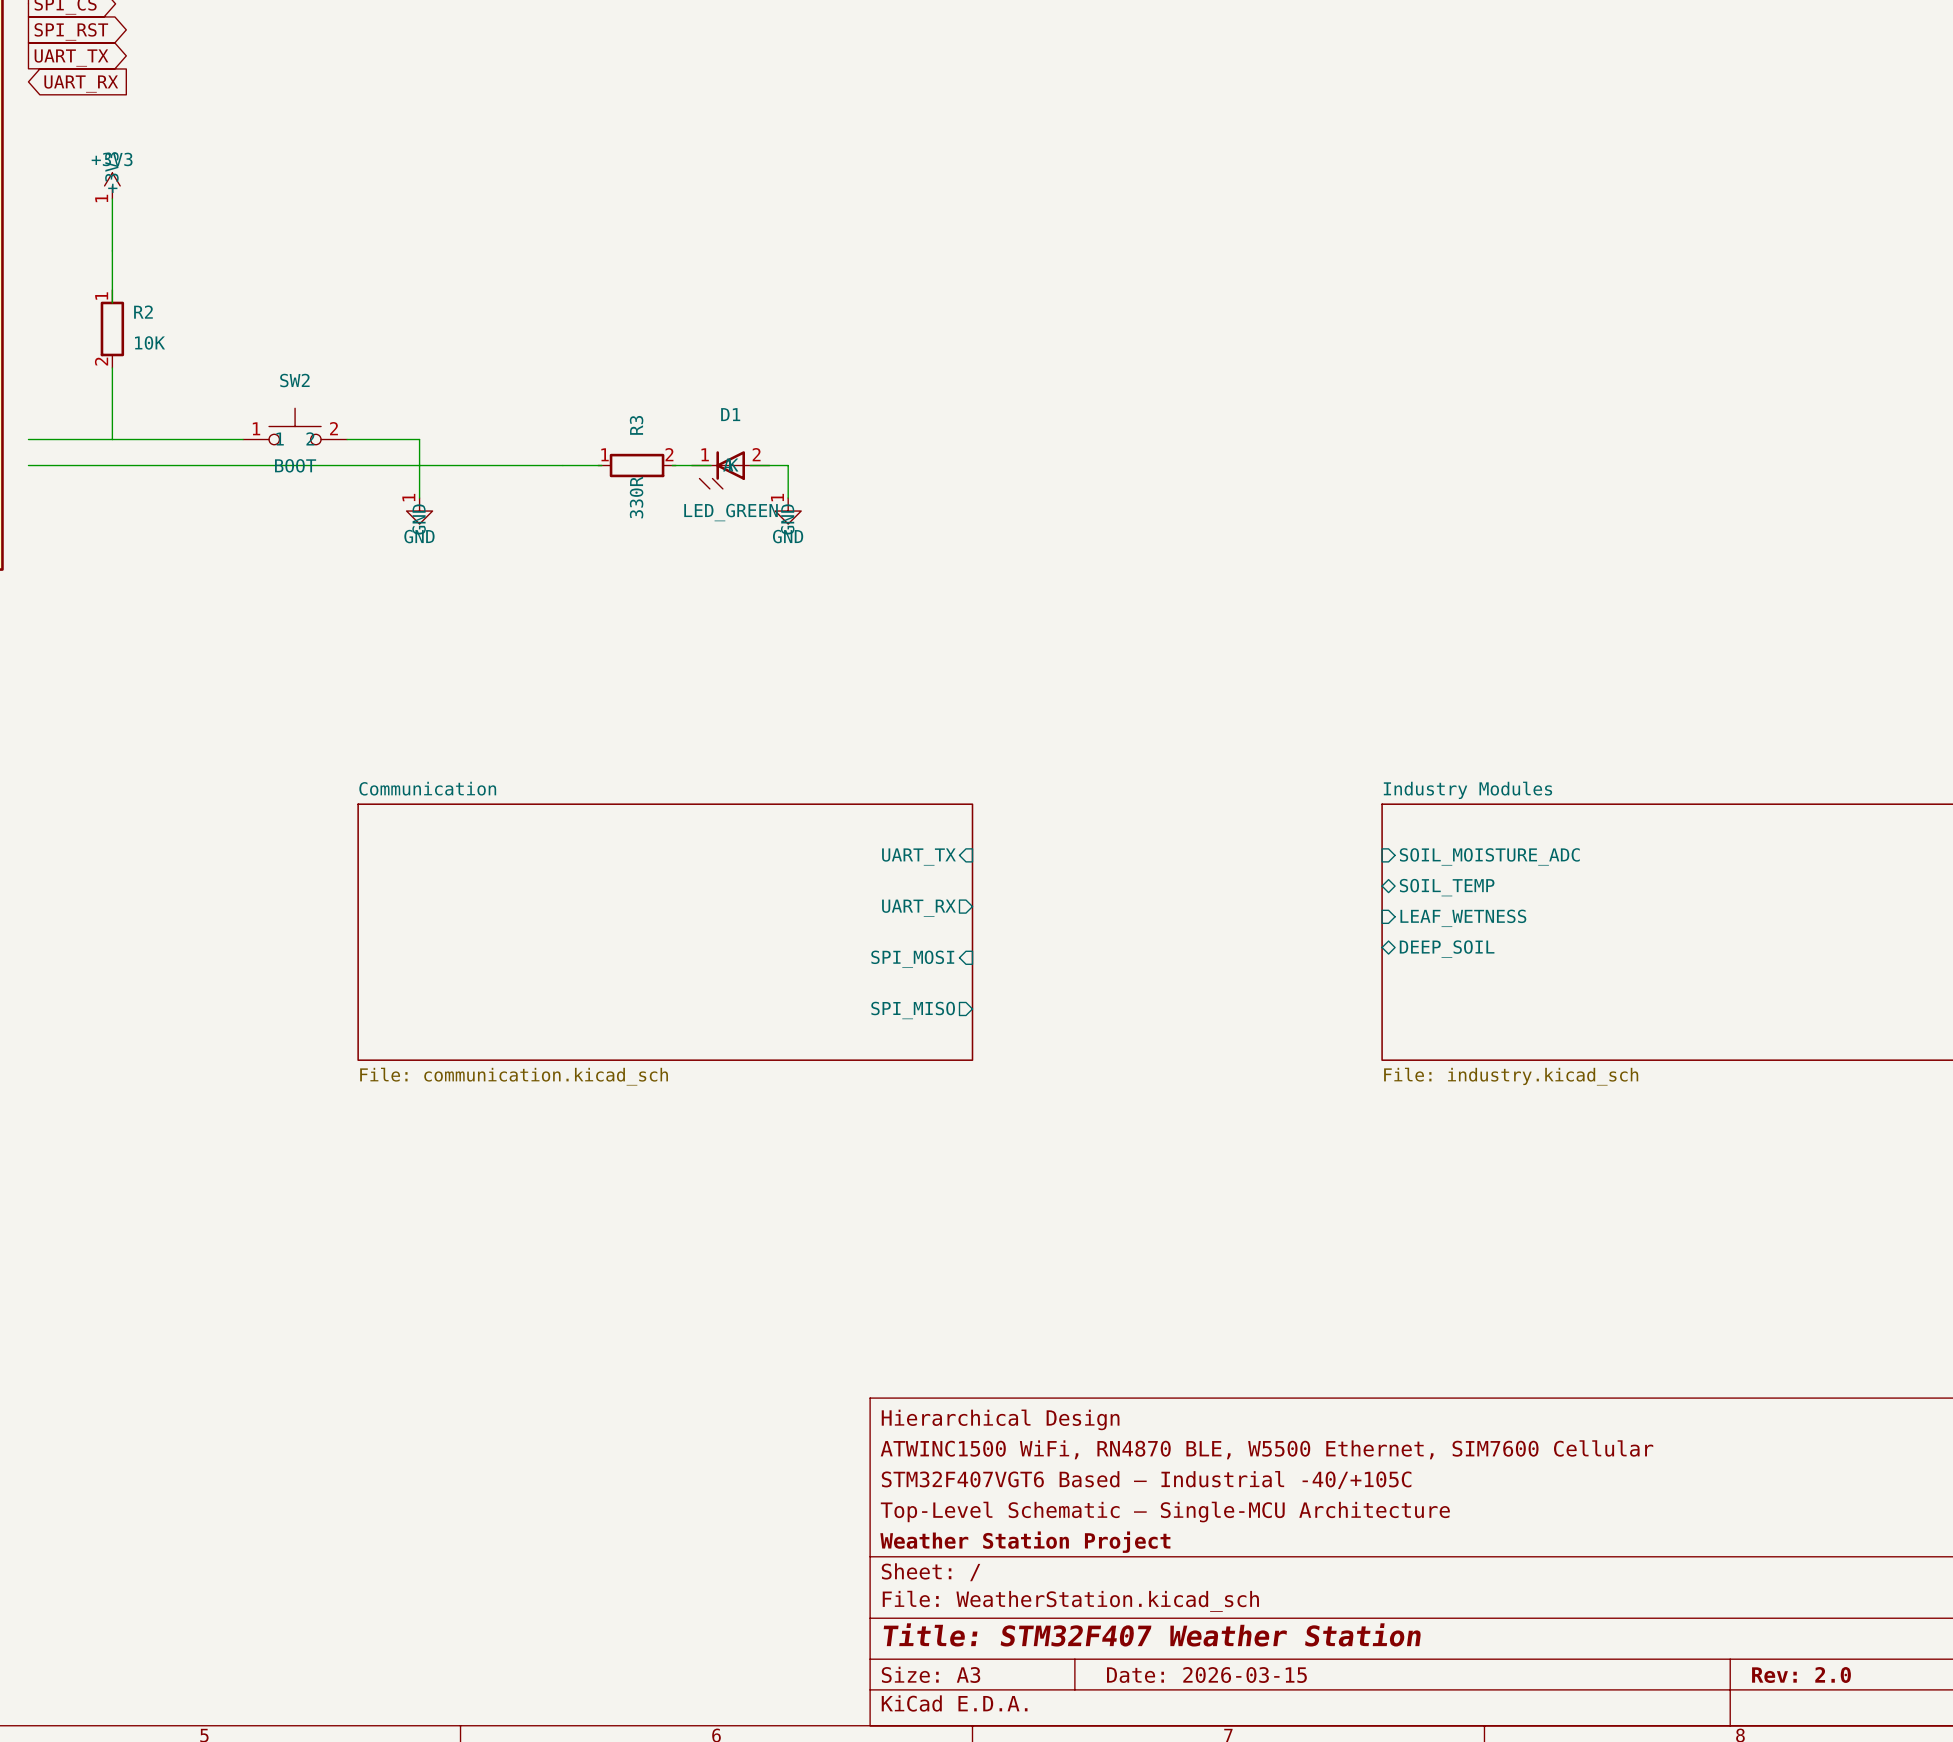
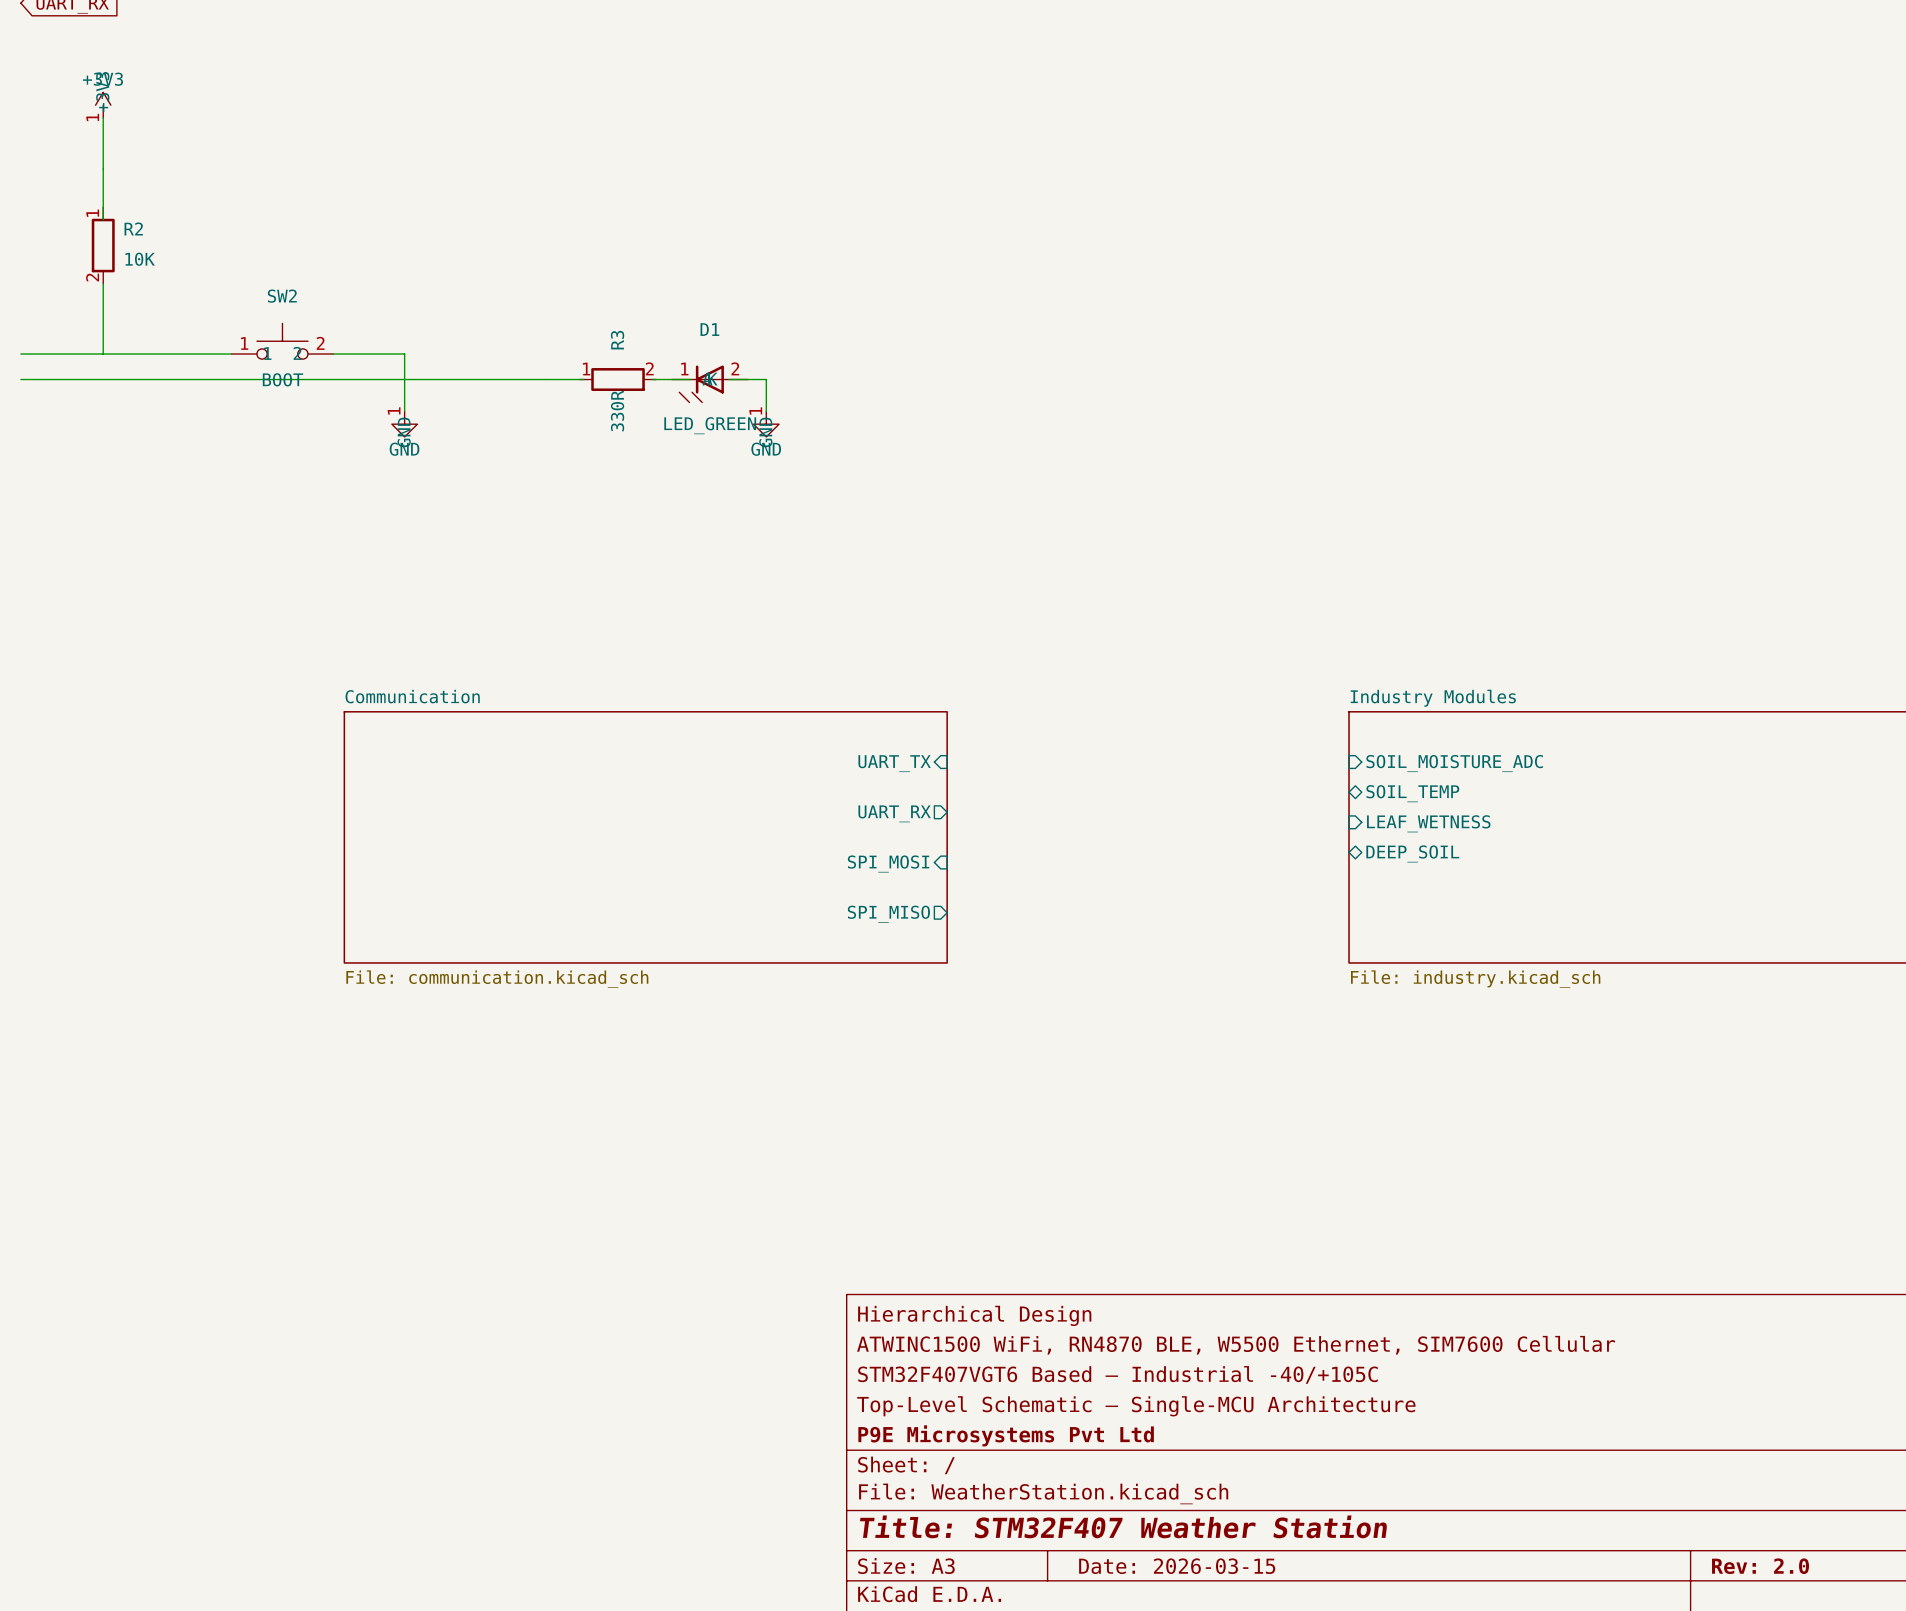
title block: Weather Station Project (1025, 1542) -> P9E Microsystems Pvt Ltd (1006, 1435)

